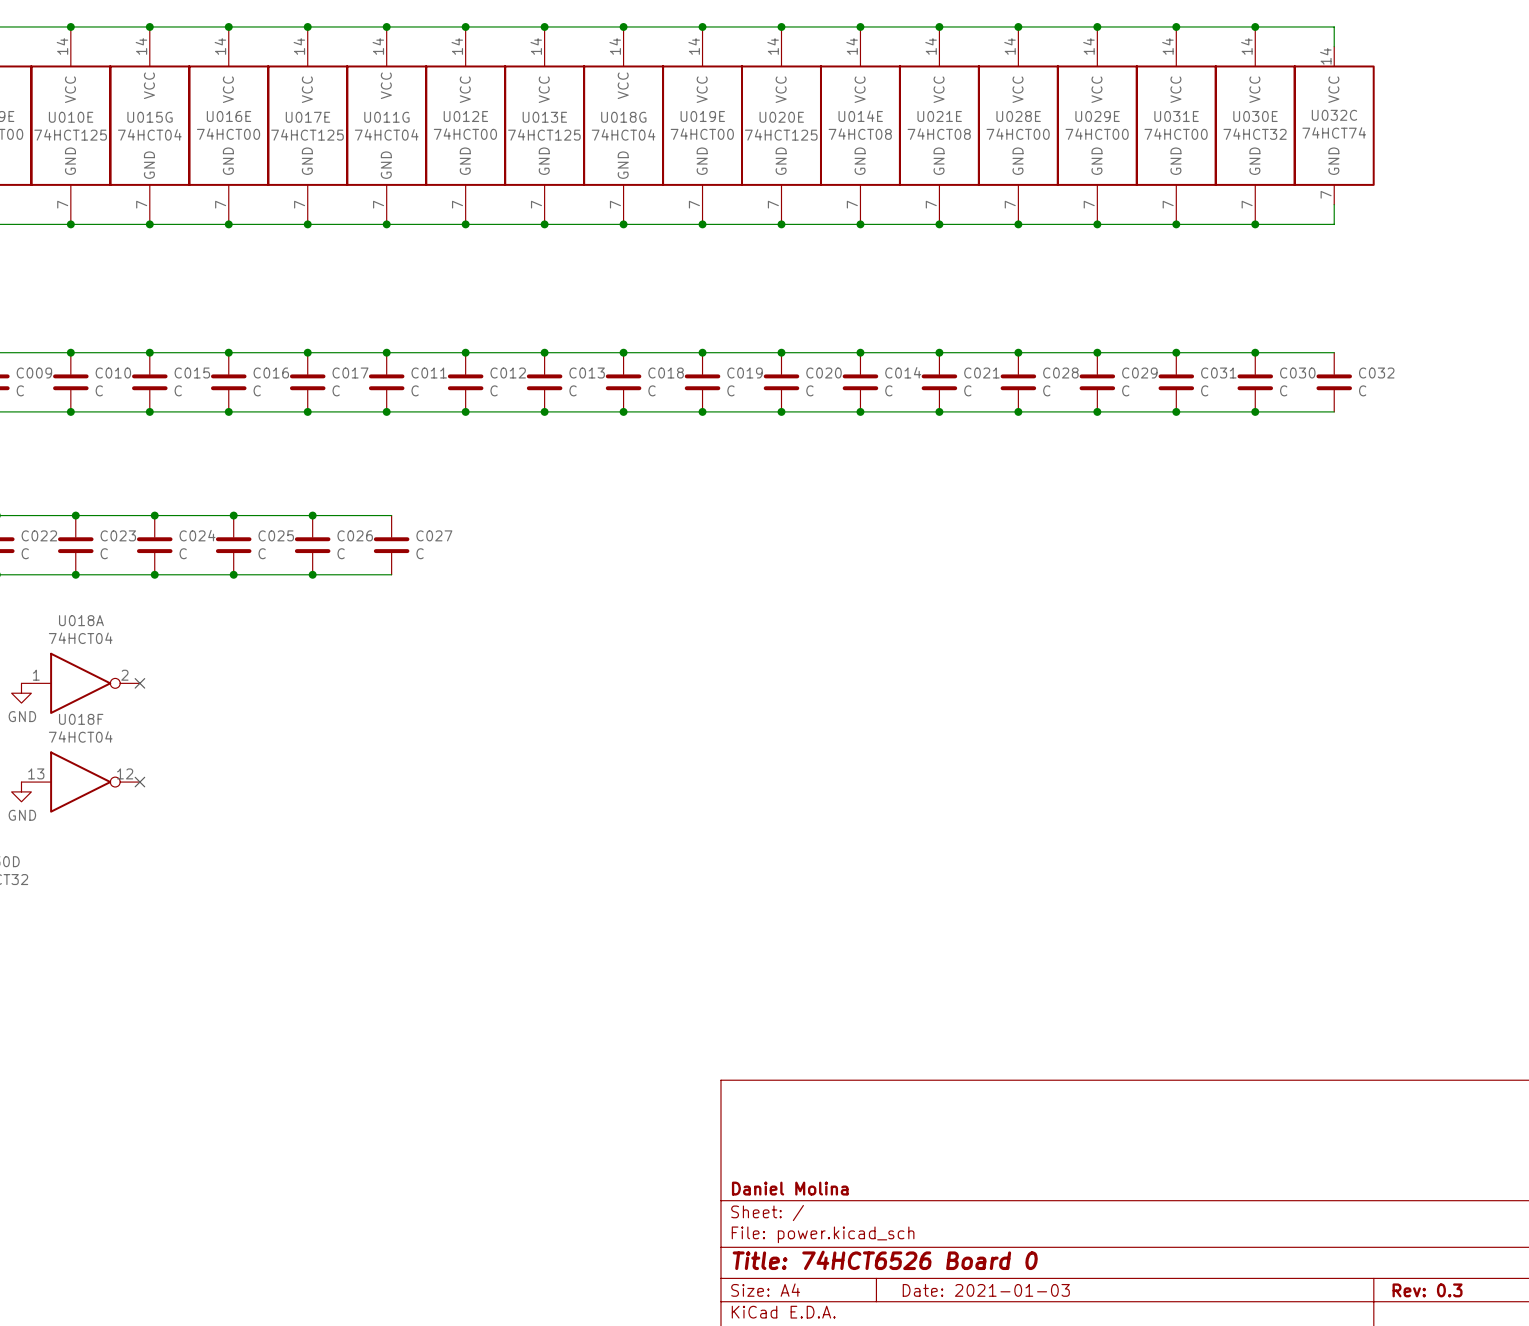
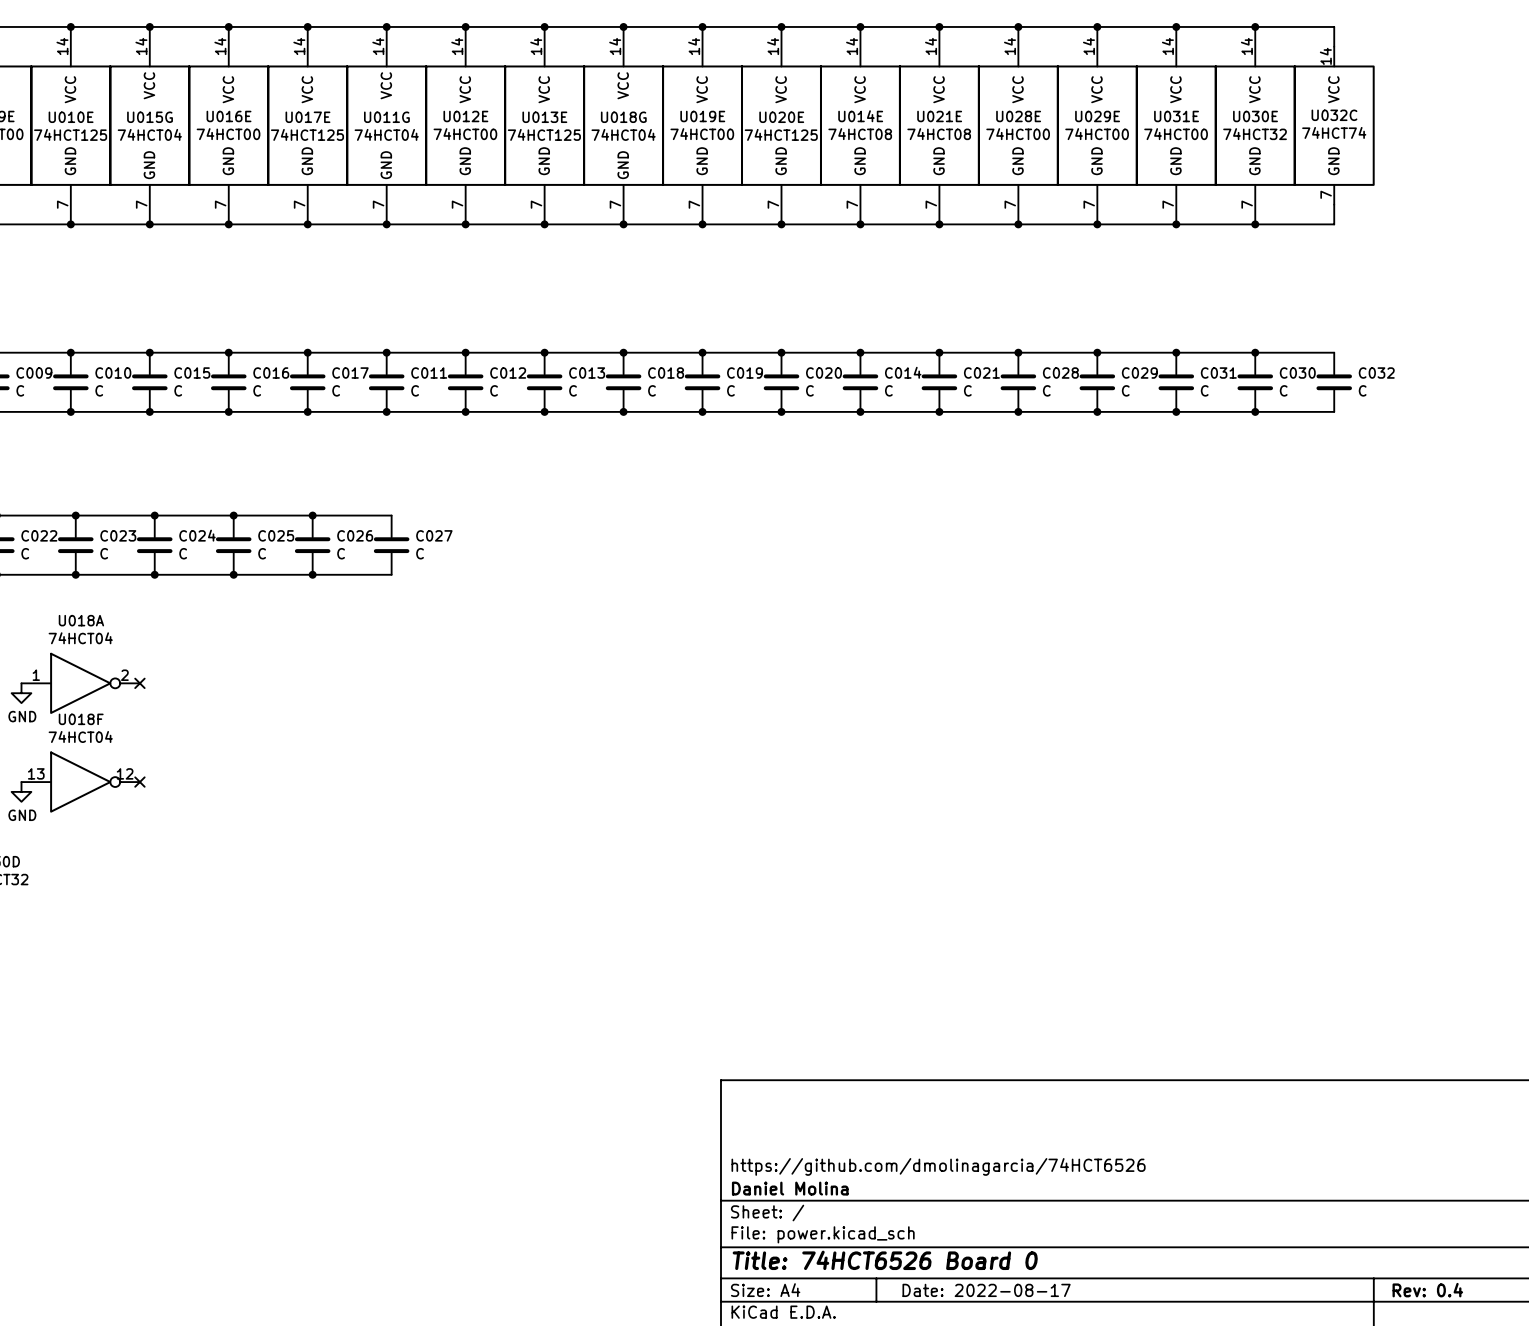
title block: none -> https://github.com/dmolinagarcia/74HCT6526 (938, 1166)
title block: Date: 2021-01-03 (986, 1290) -> Date: 2022-08-17 (986, 1290)
title block: Rev: 0.3 (1427, 1290) -> Rev: 0.4 (1427, 1290)

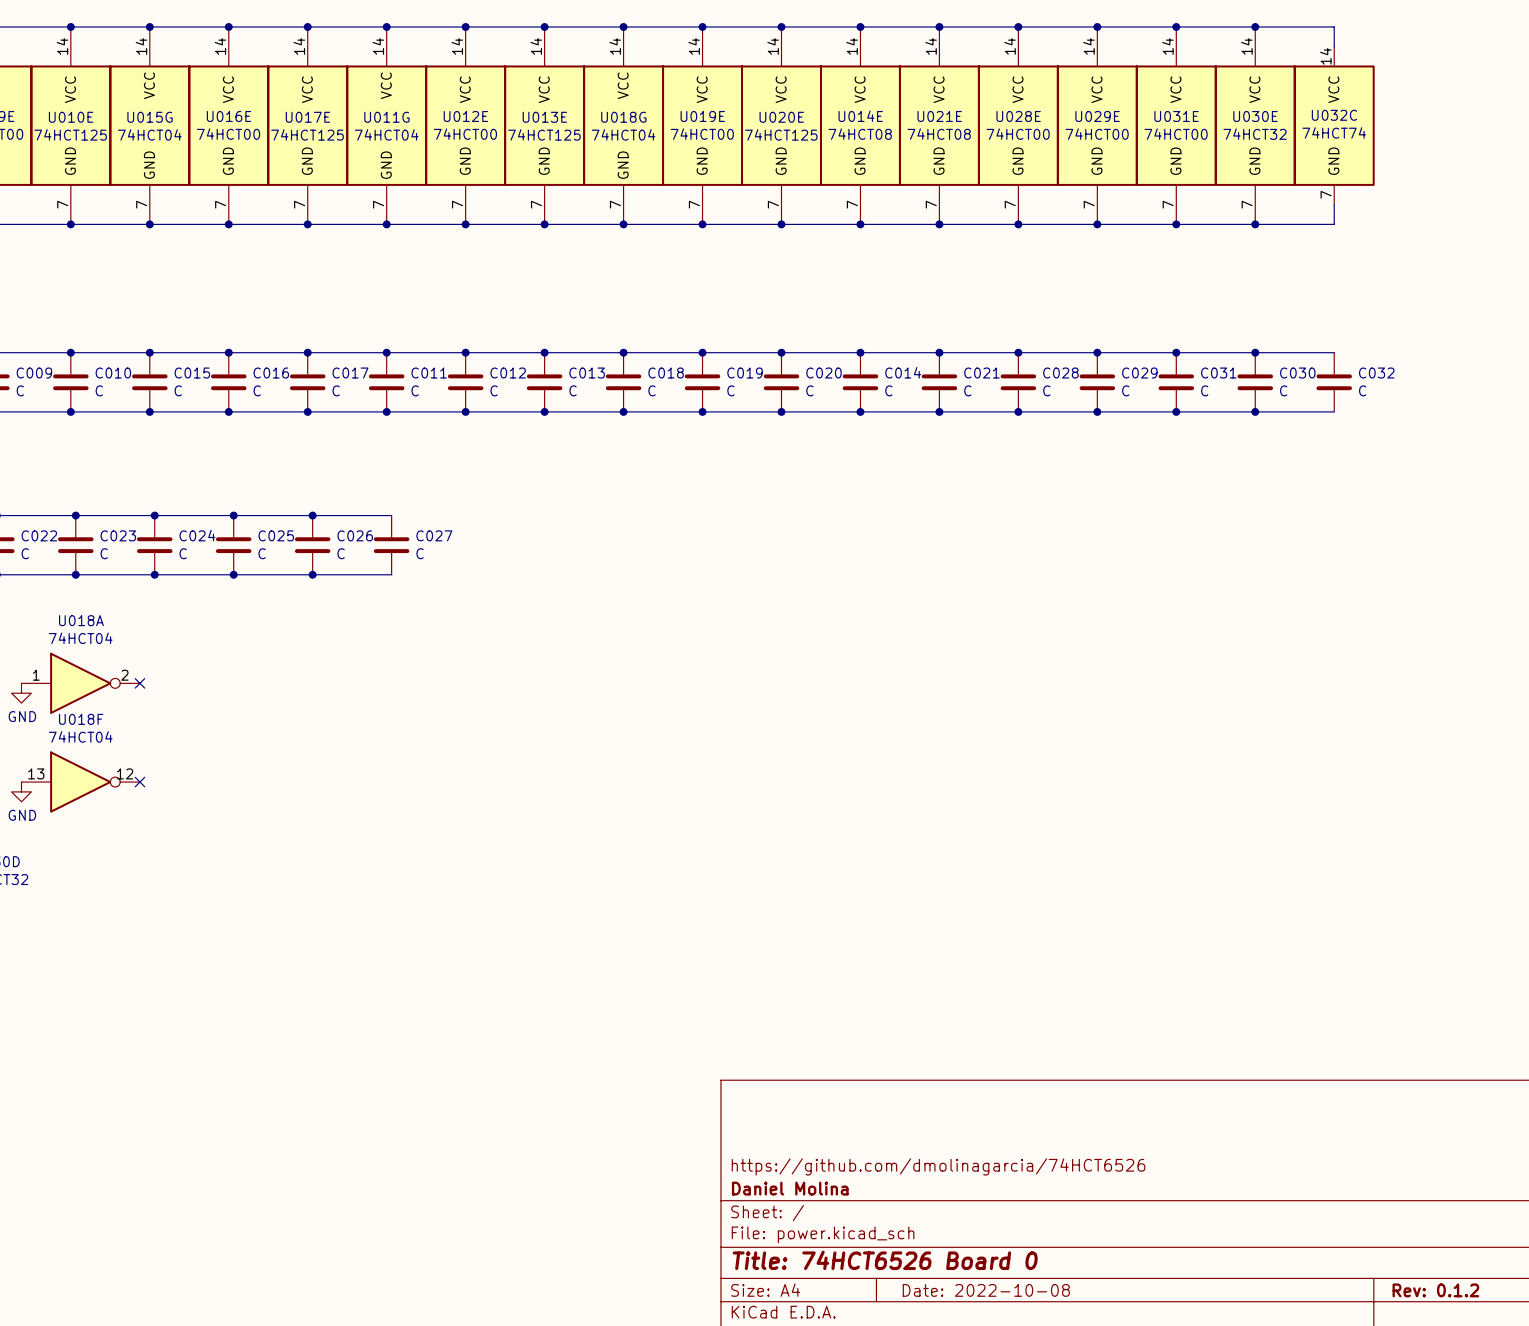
title block: Date: 2022-08-17 (986, 1290) -> Date: 2022-10-08 (986, 1290)
title block: Rev: 0.4 (1427, 1290) -> Rev: 0.1.2 (1435, 1290)

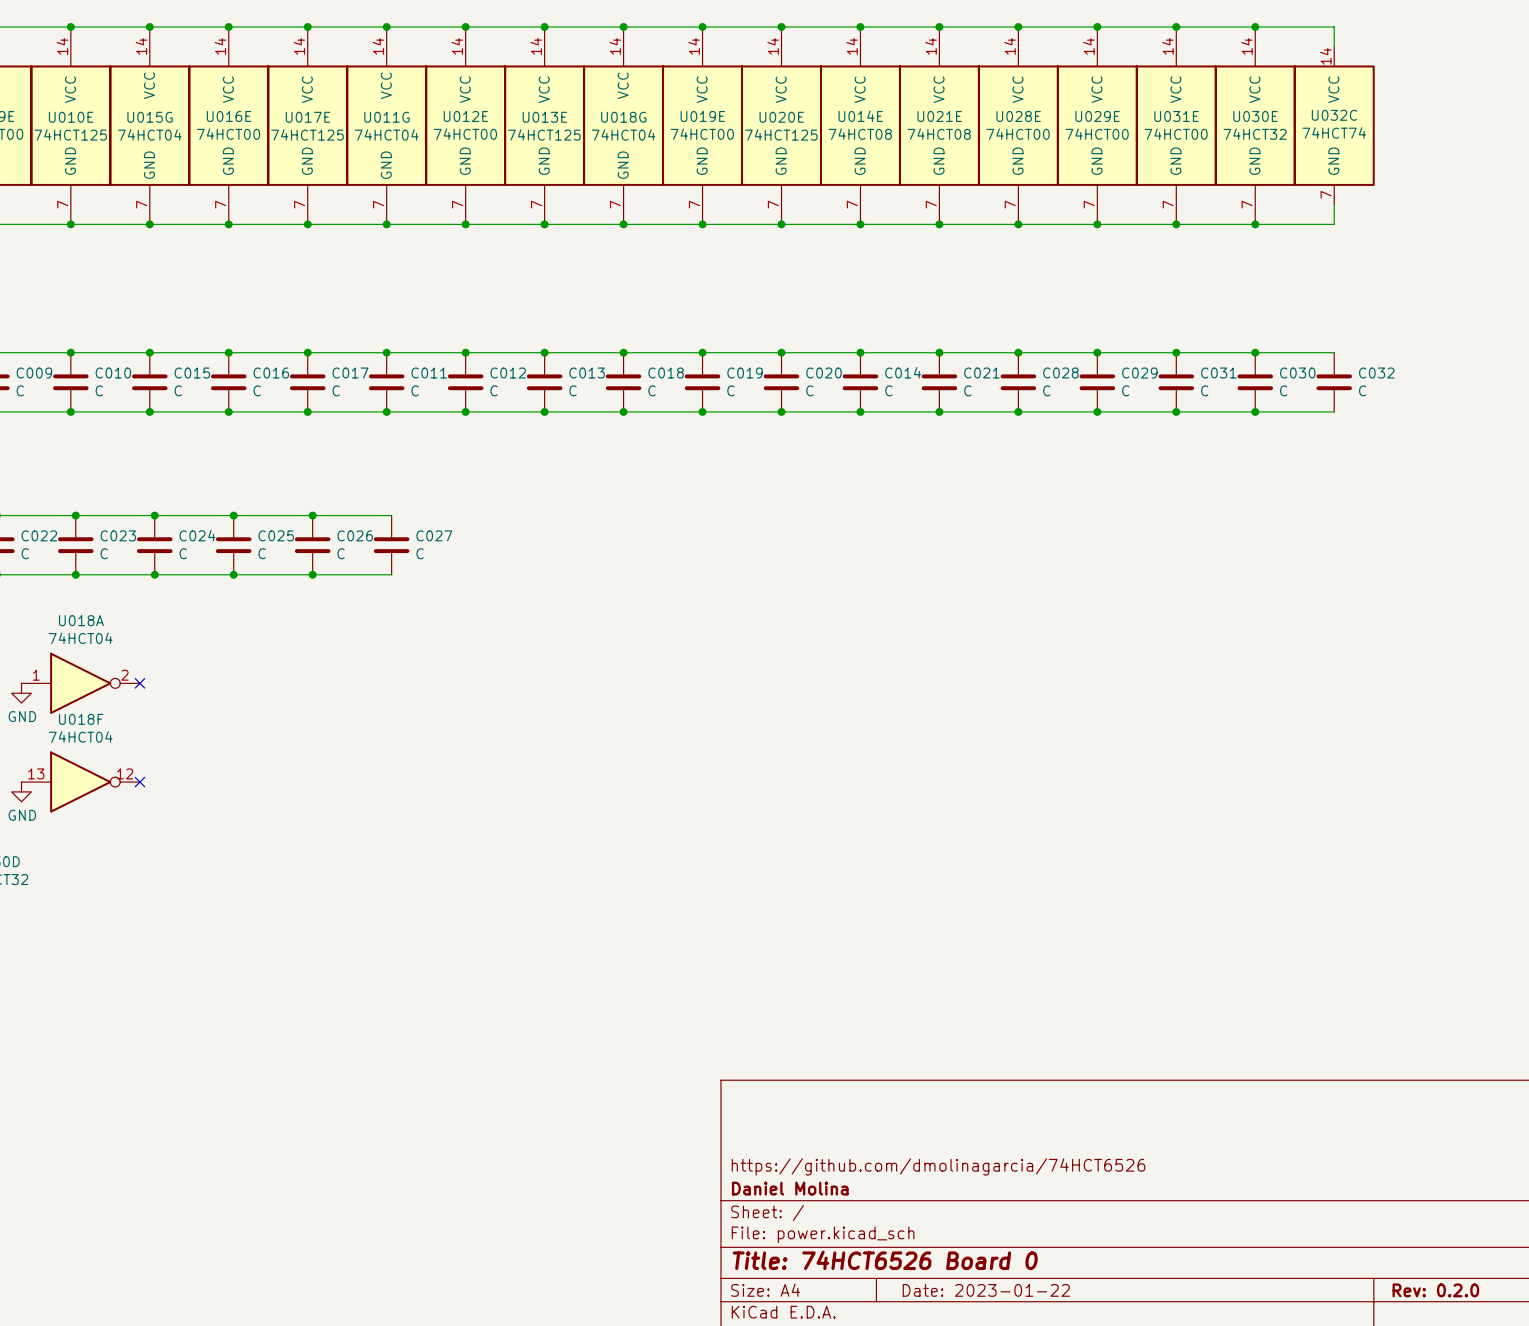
title block: Date: 2022-10-08 (986, 1290) -> Date: 2023-01-22 (986, 1290)
title block: Rev: 0.1.2 (1435, 1290) -> Rev: 0.2.0 (1435, 1290)

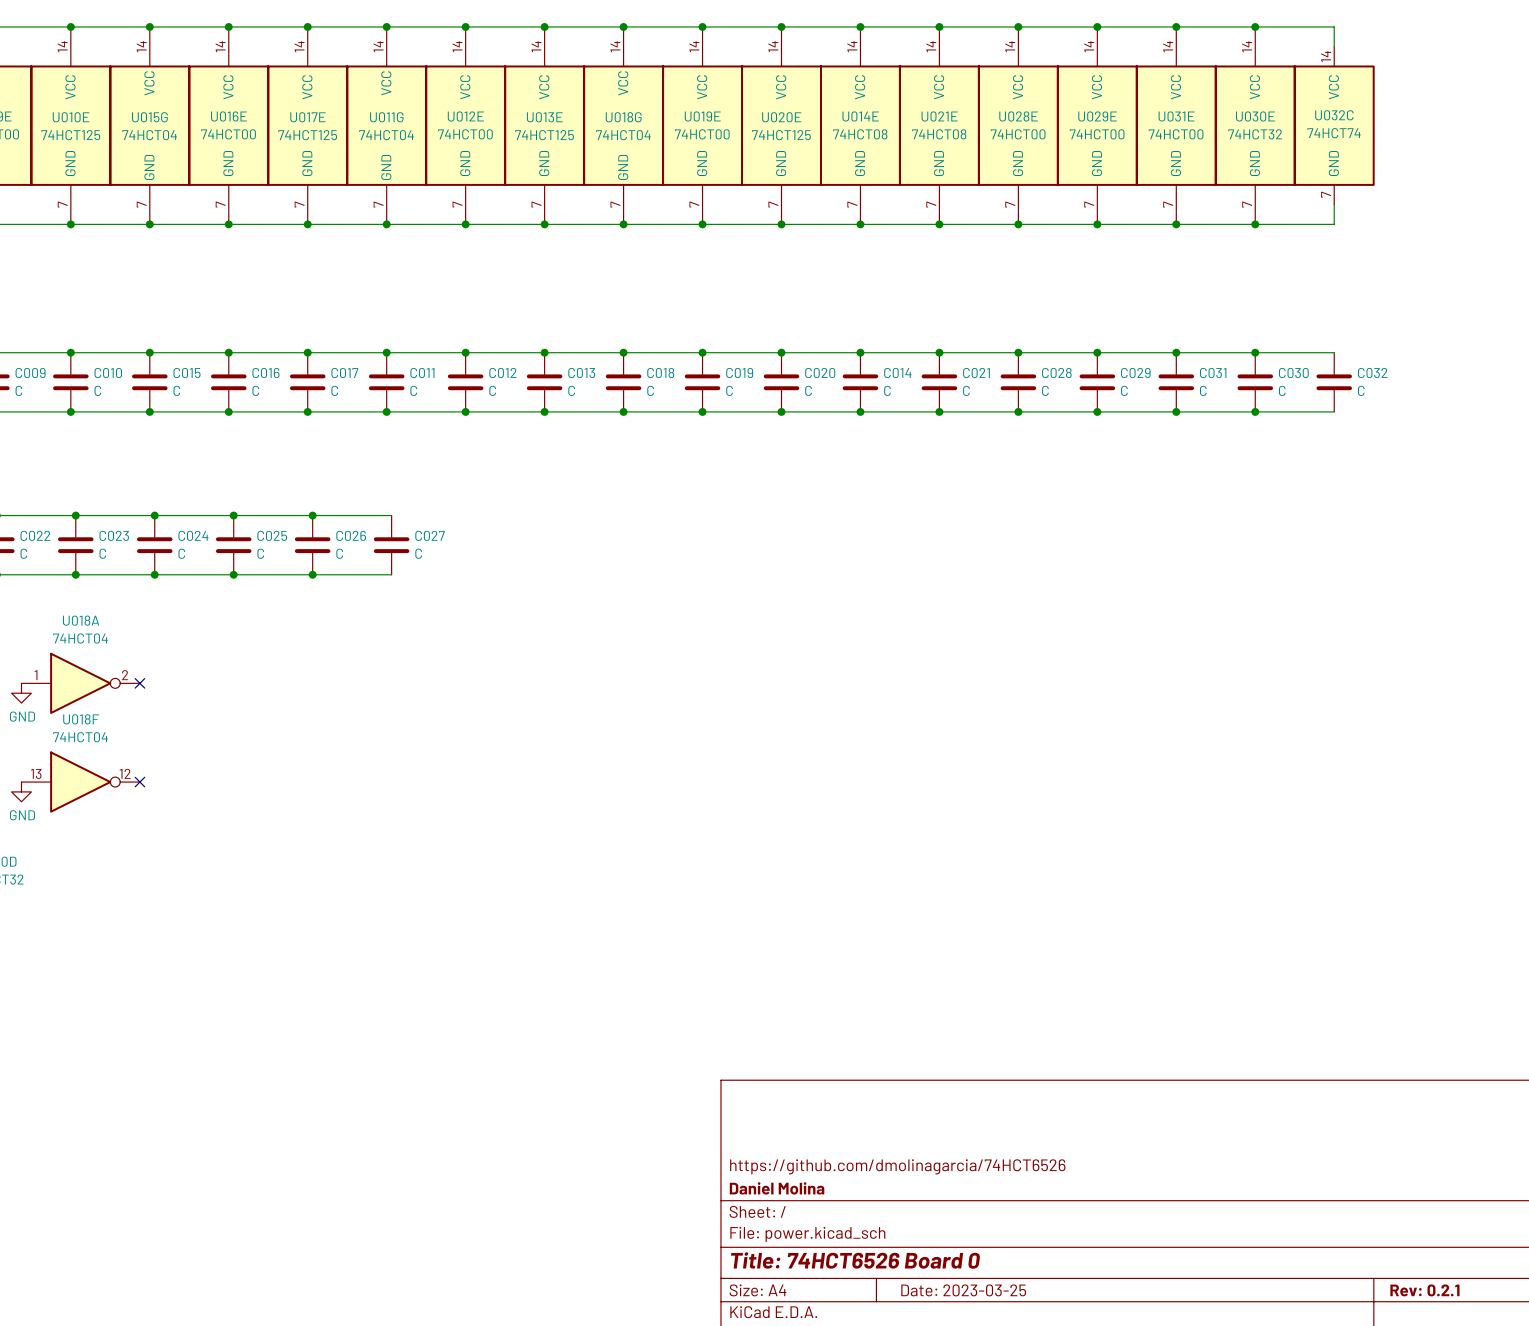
title block: Date: 2023-01-22 (986, 1290) -> Date: 2023-03-25 (963, 1290)
title block: Rev: 0.2.0 (1435, 1290) -> Rev: 0.2.1 (1424, 1290)

